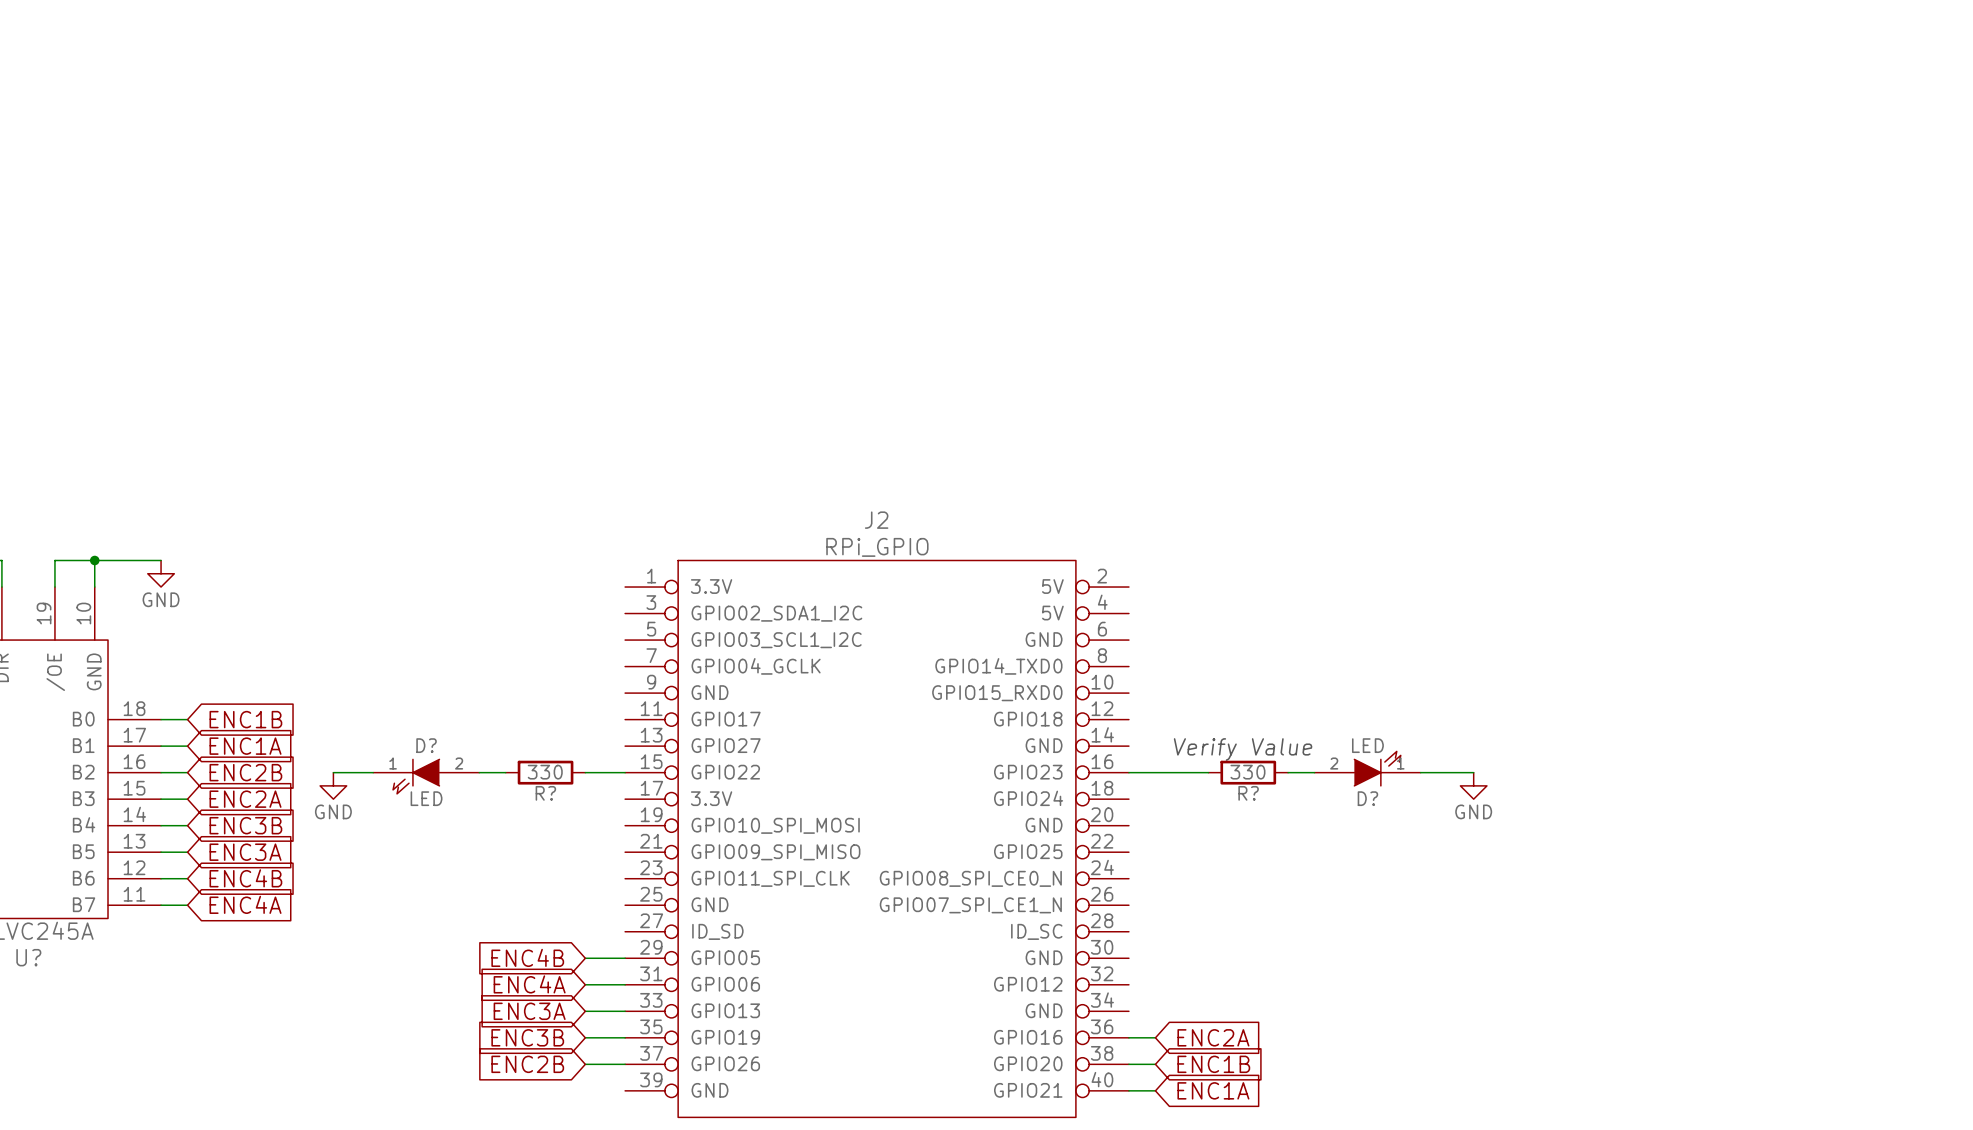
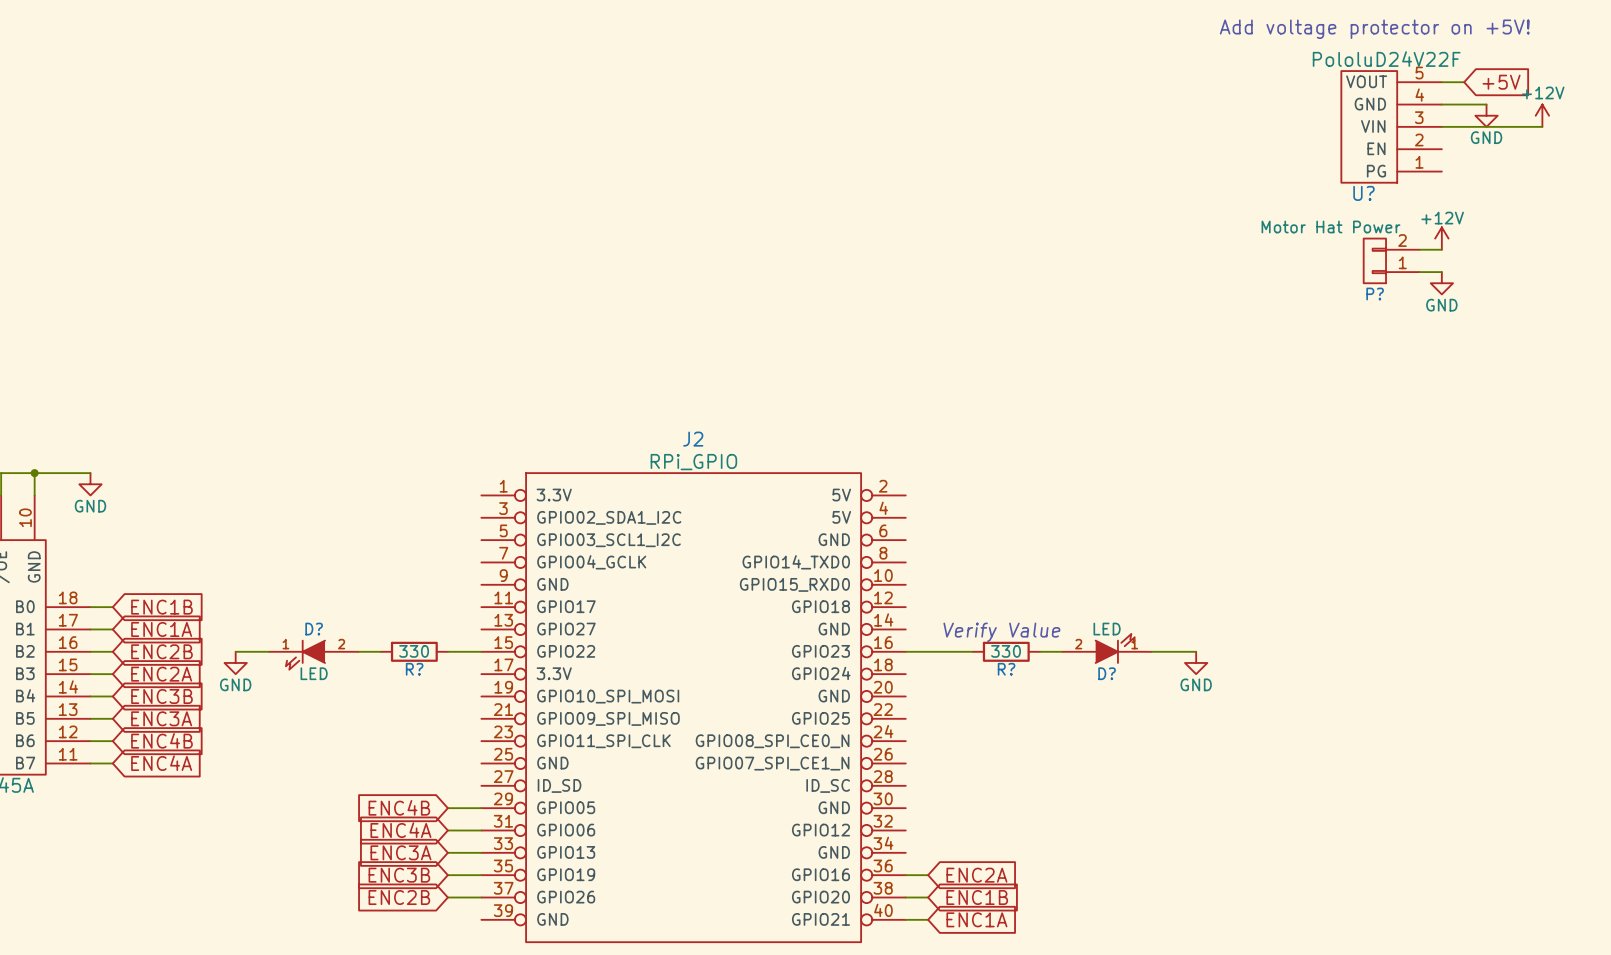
text: none -> Add voltage protector on +5V! (1374, 29)
wire: none -> (1441, 82) (1464, 82)
global label: none -> +5V (1501, 82)
wire: none -> (1441, 104) (1486, 104)
power symbol: none -> GND (1486, 115)
power symbol: none -> +12V (1542, 115)
U?: none -> PololuD24V22F (1391, 126)
wire: none -> (1441, 126) (1542, 126)
power symbol: none -> +12V (1441, 238)
wire: none -> (1419, 249) (1441, 249)
P?: none -> Motor Hat Power (1391, 260)
wire: none -> (1419, 272) (1441, 272)
power symbol: none -> GND (1441, 283)

